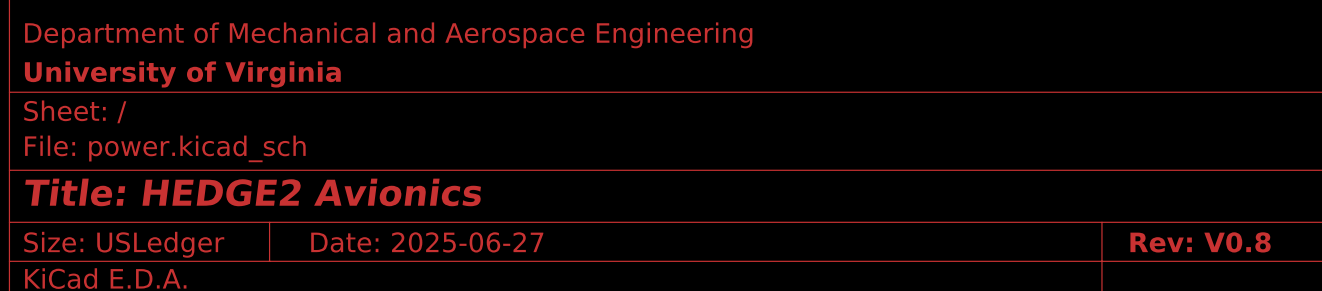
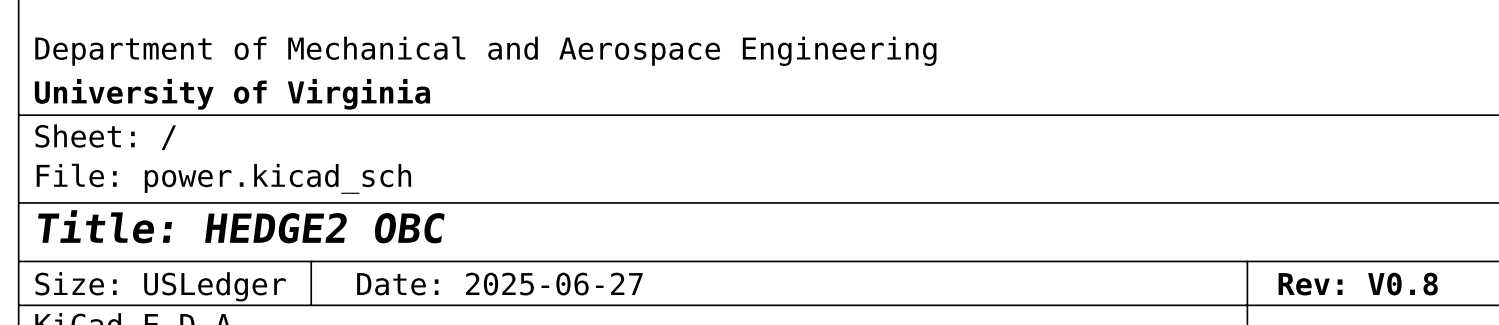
title block: Title: HEDGE2 Avionics (253, 192) -> Title: HEDGE2 OBC (241, 226)

